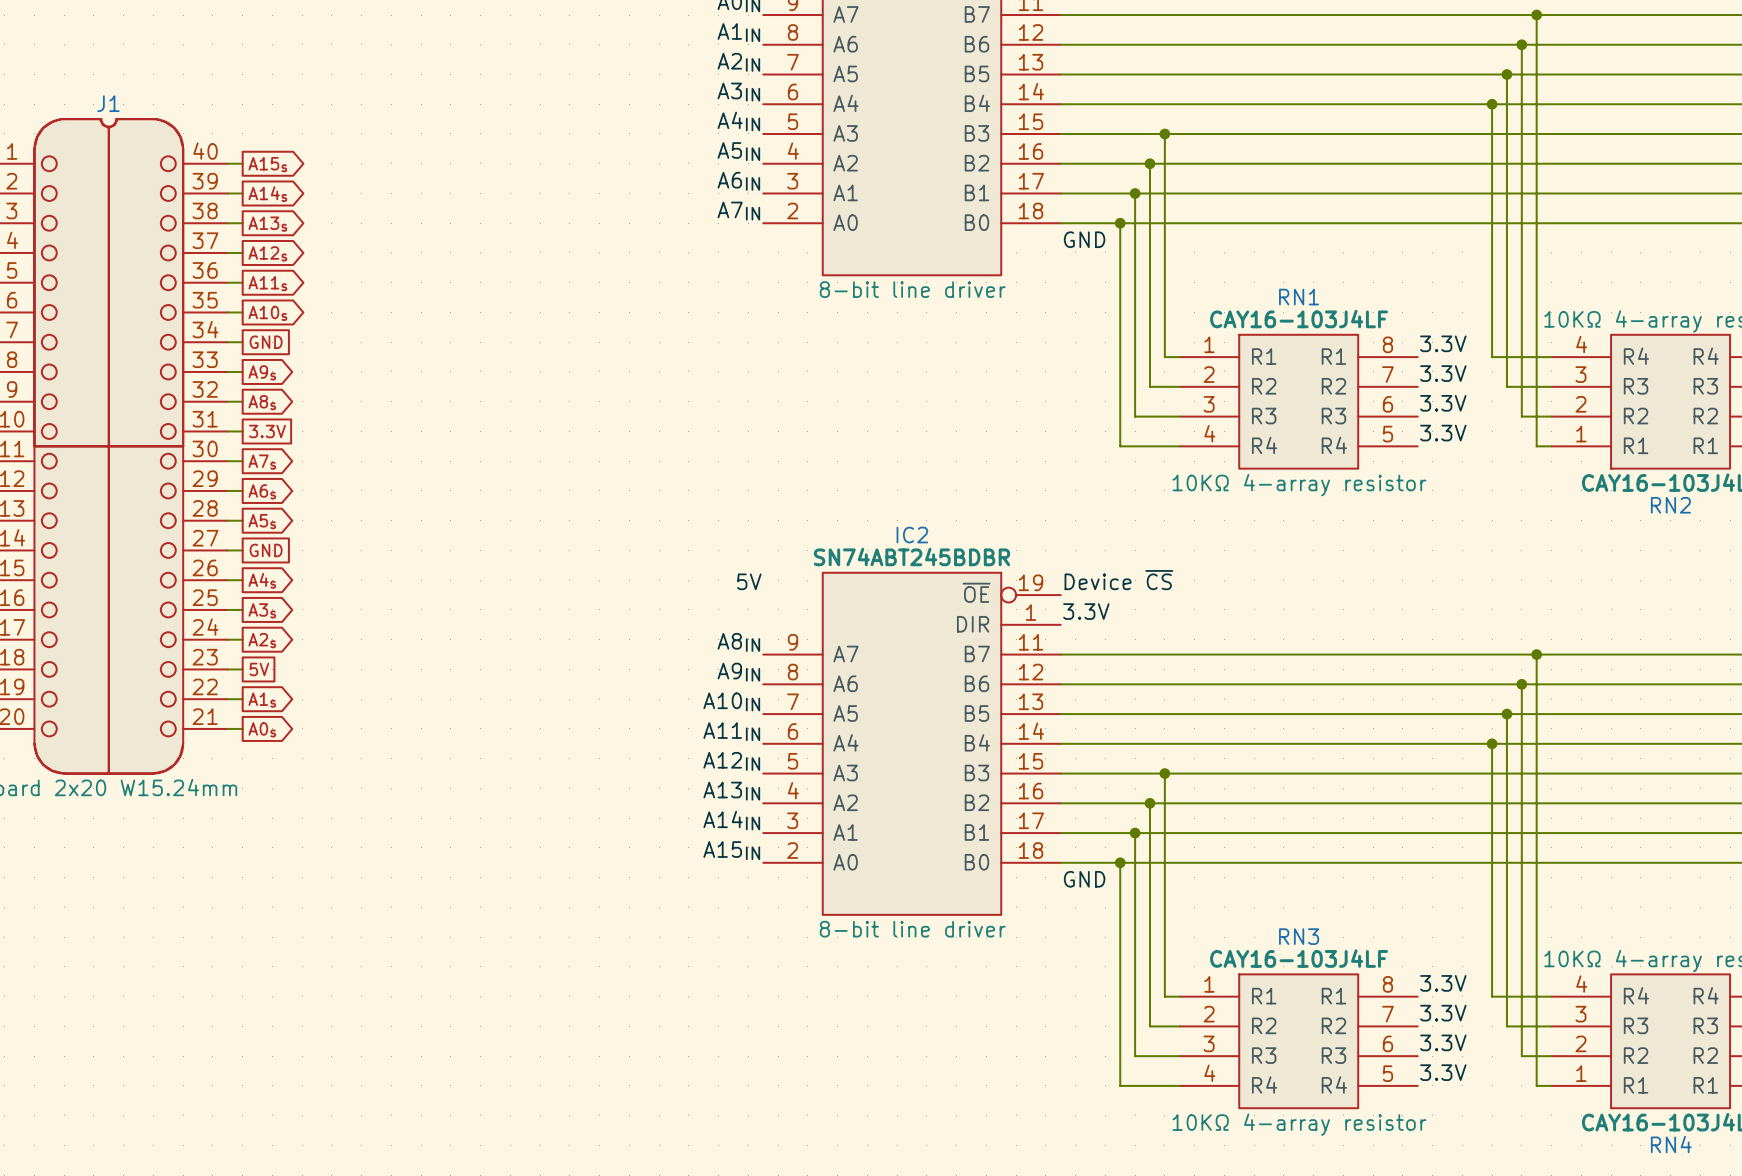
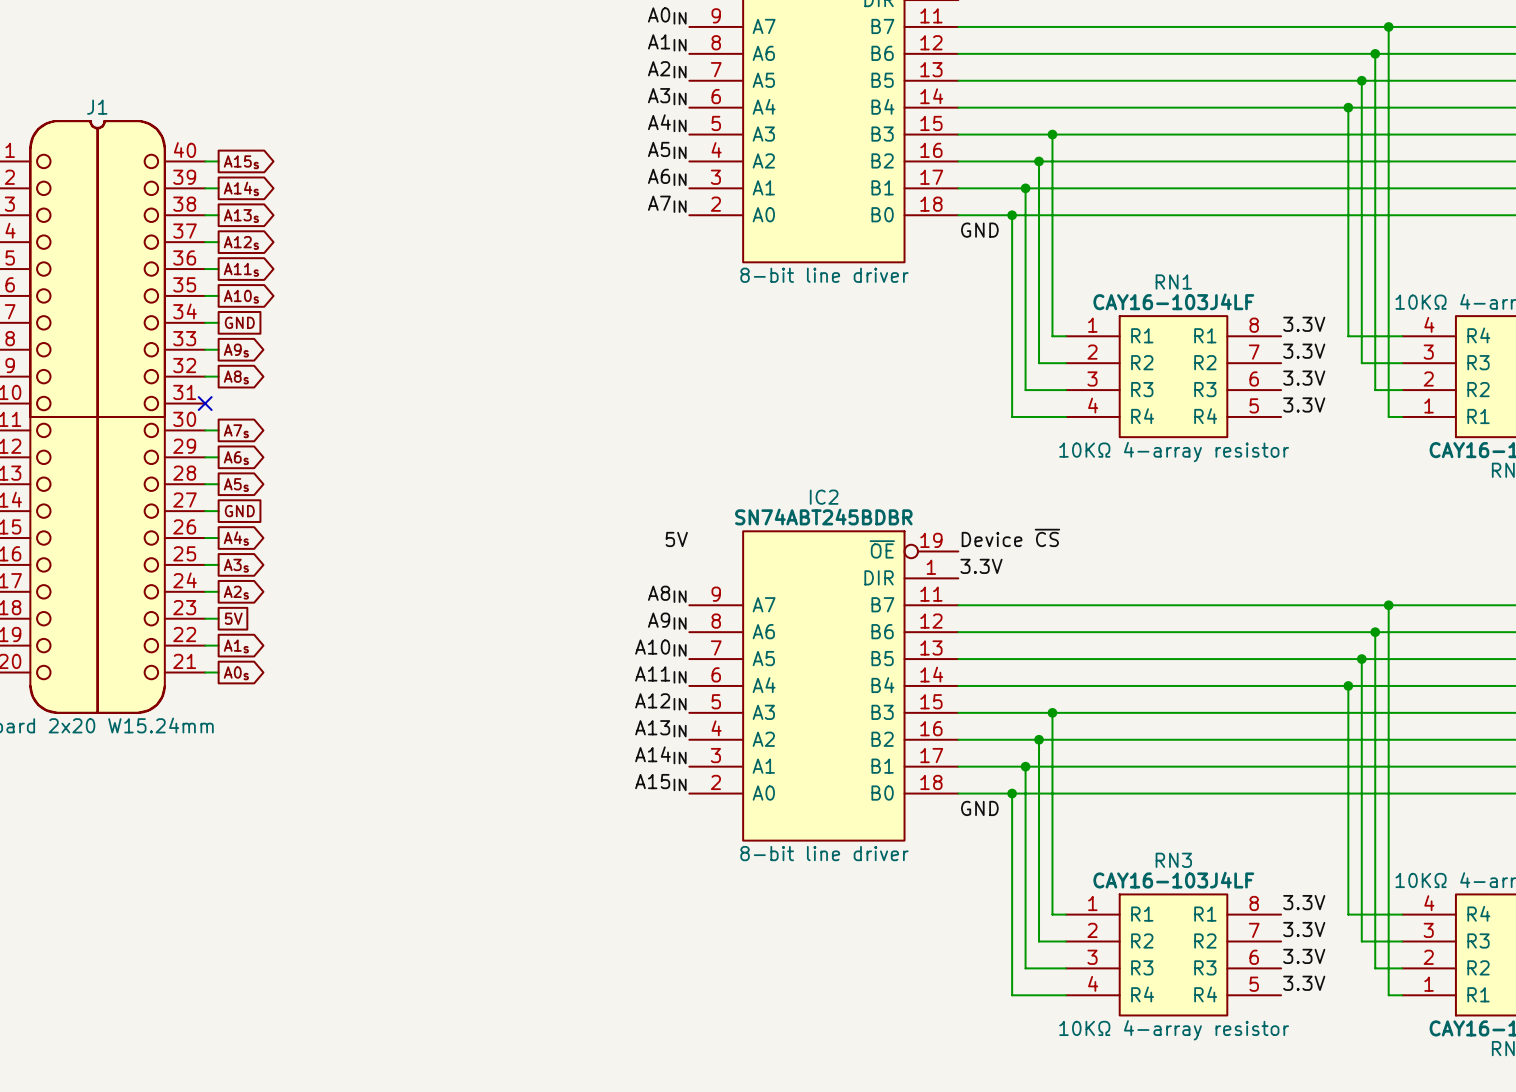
wire: (227, 431) (242, 431) -> none
no-connect mark: none -> (205, 403)
global label: 3.3V (267, 431) -> none

